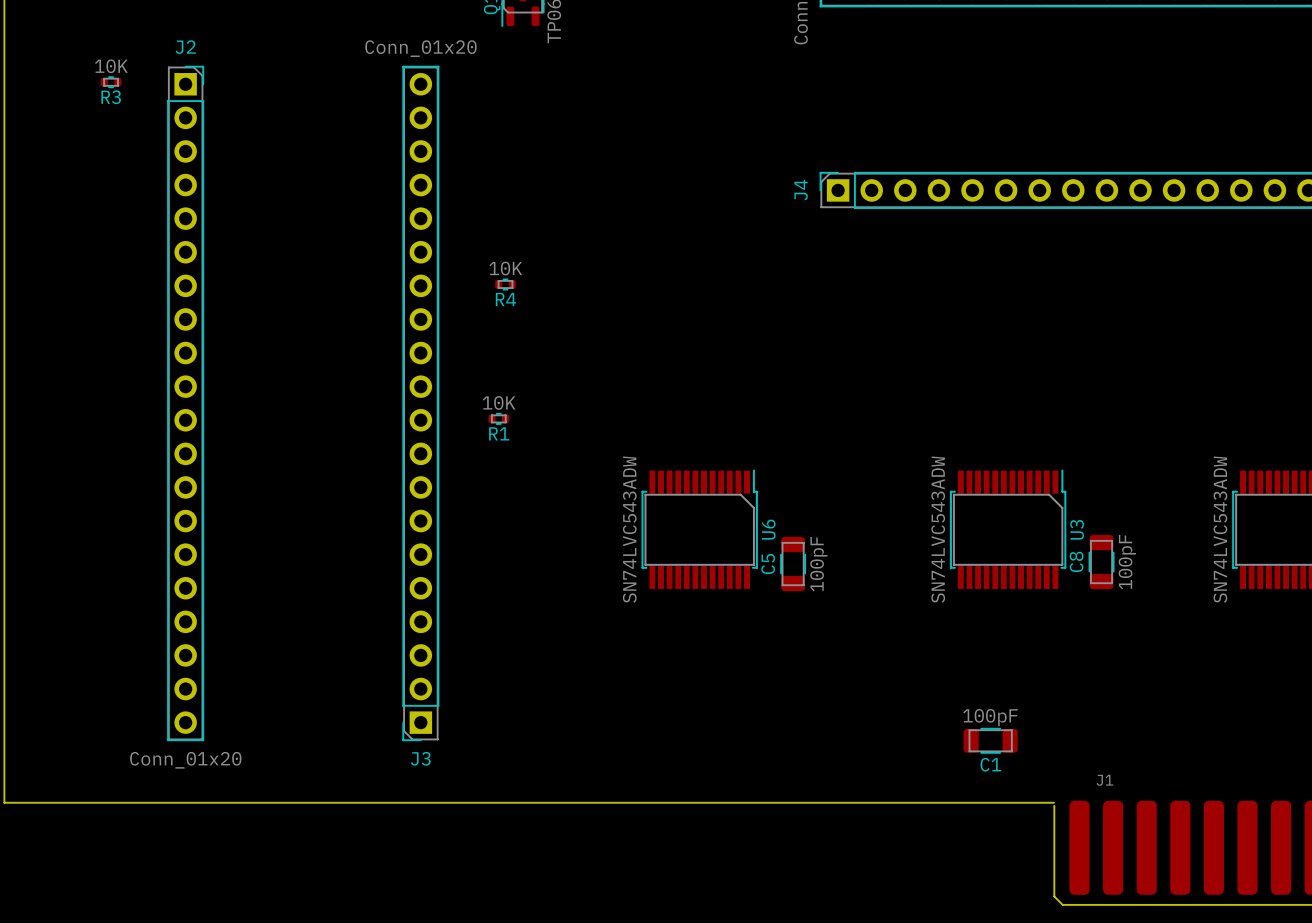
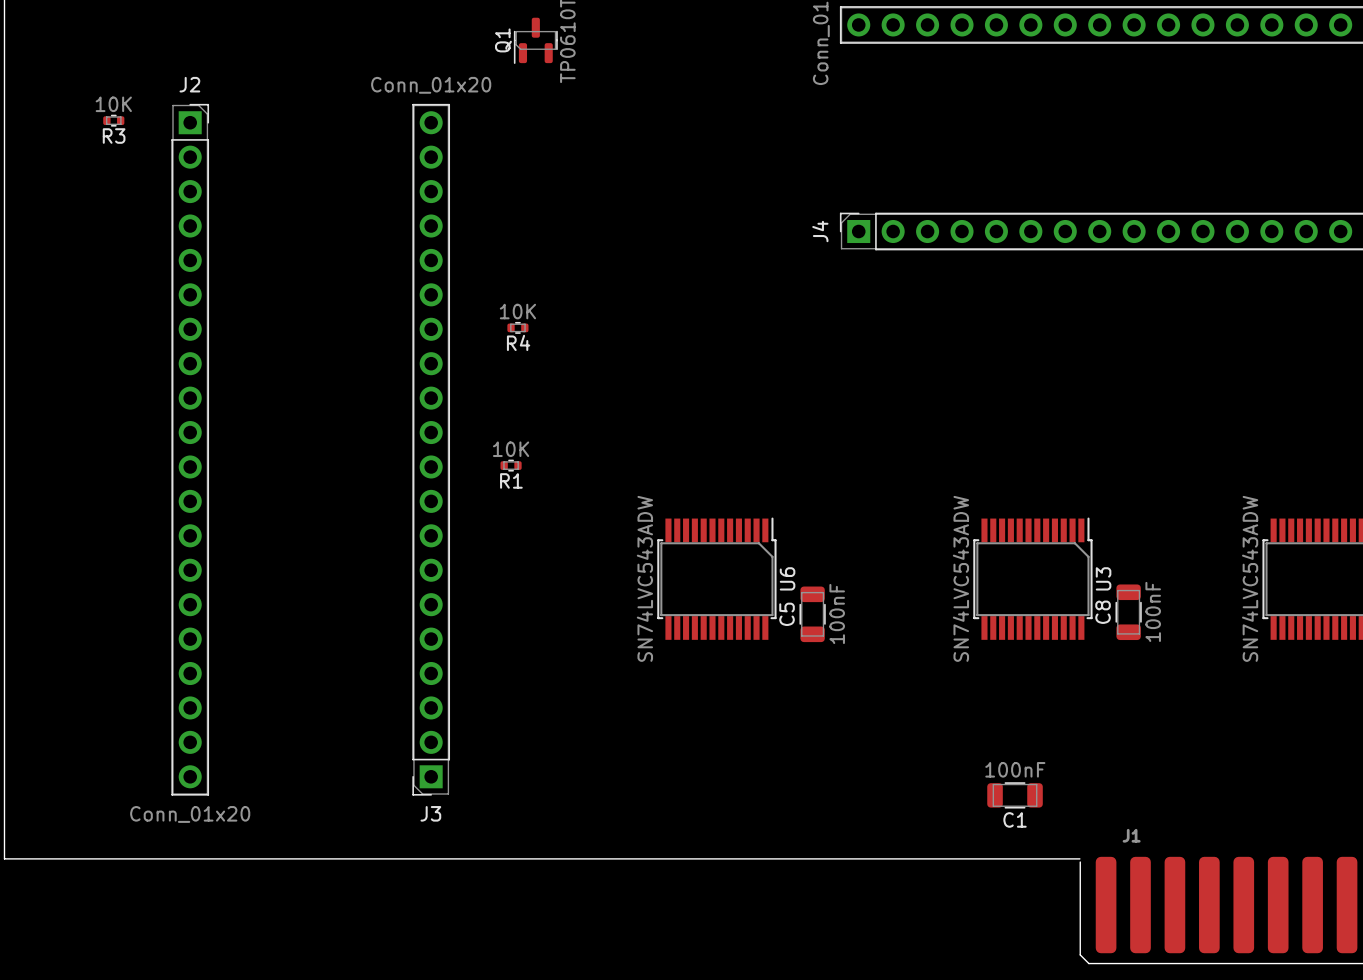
C8 value: 100pF (1127, 562) -> 100nF (1153, 611)
C5 value: 100pF (818, 564) -> 100nF (837, 613)
C1 value: 100pF (990, 717) -> 100nF (1015, 769)

